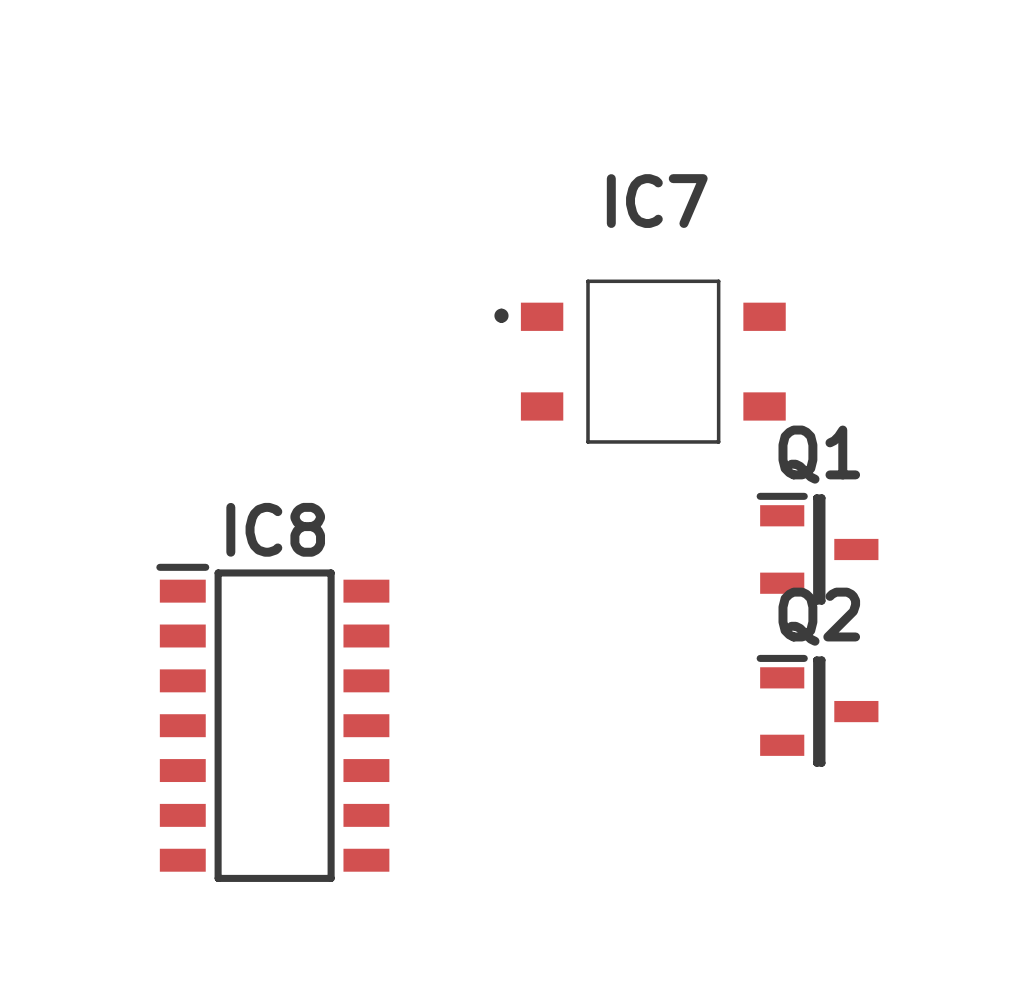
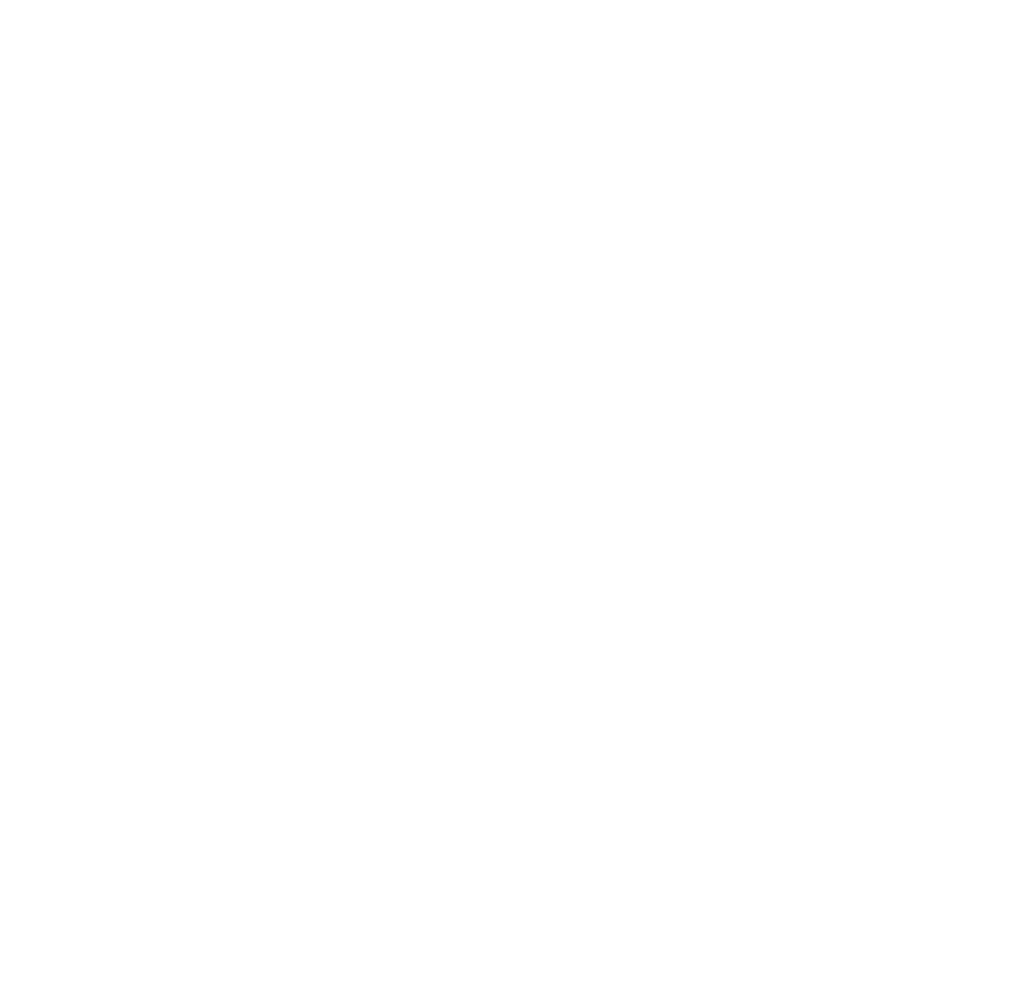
IC7: (640, 361) -> none
Q1: (817, 548) -> none
Q2: (817, 710) -> none
IC8: (272, 722) -> none

